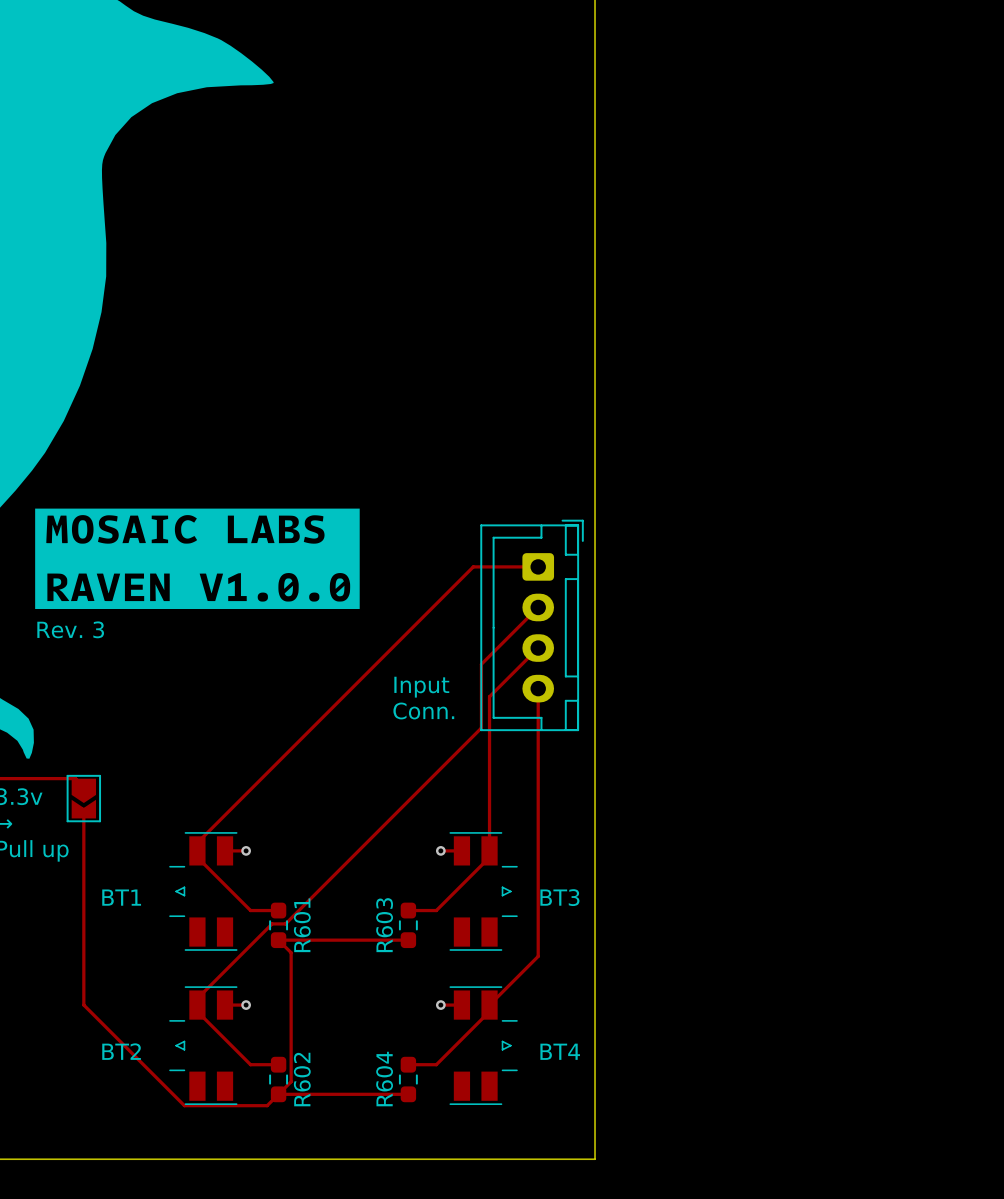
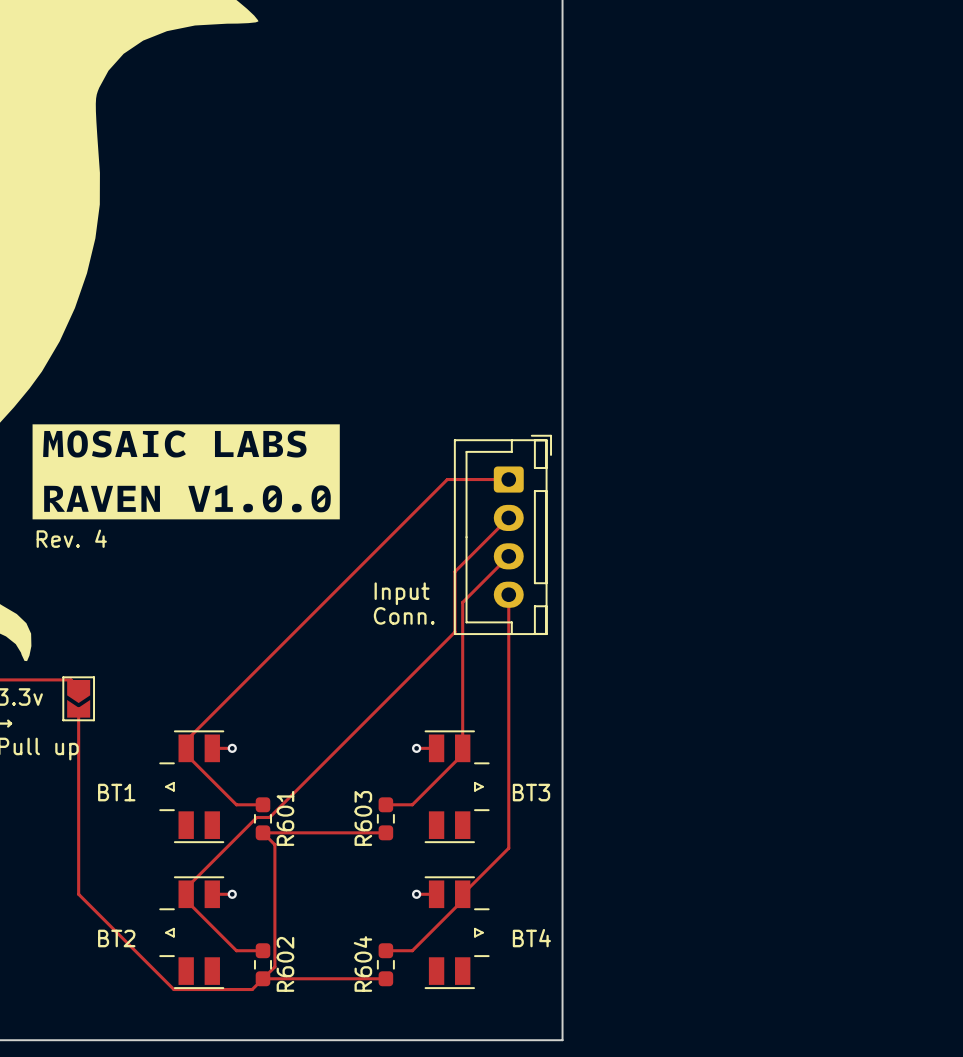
text: Rev. 3 (70, 629) -> Rev. 4 (71, 538)

